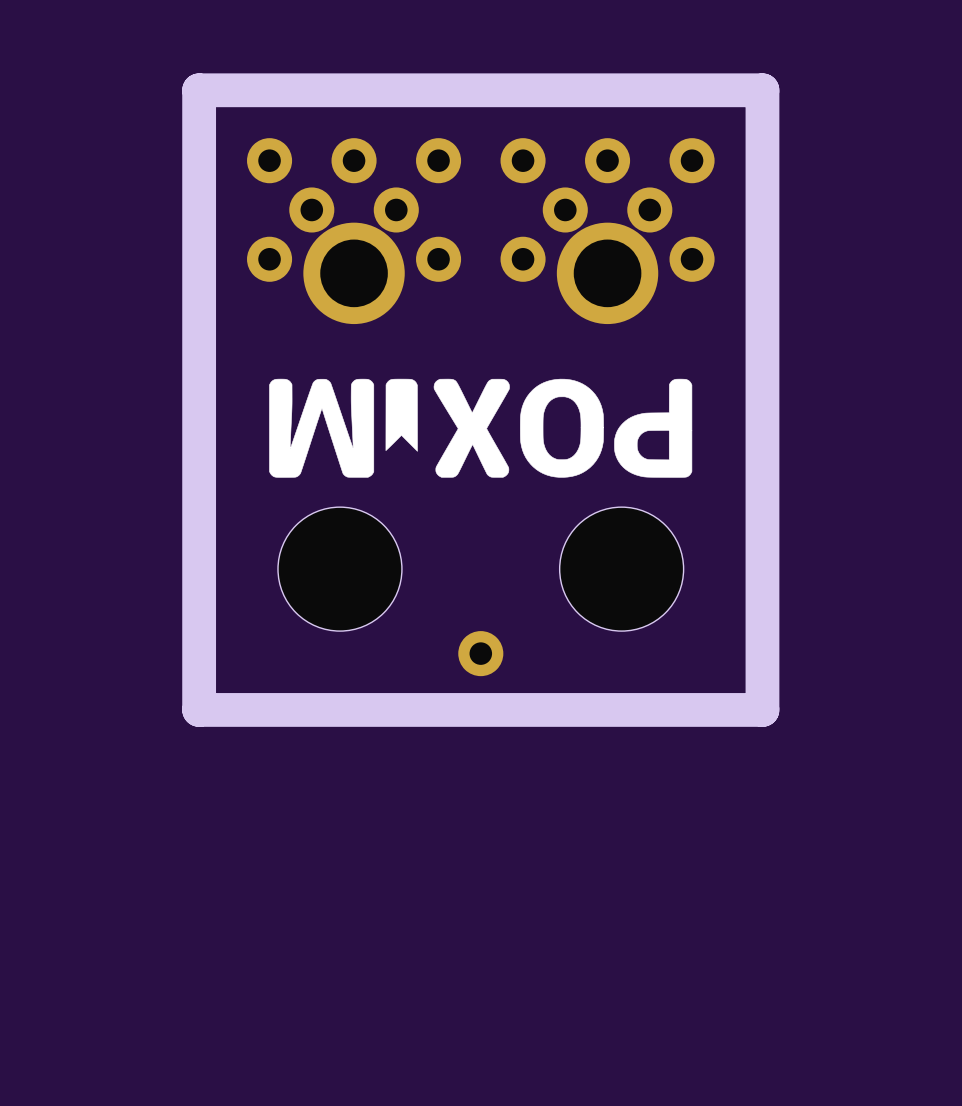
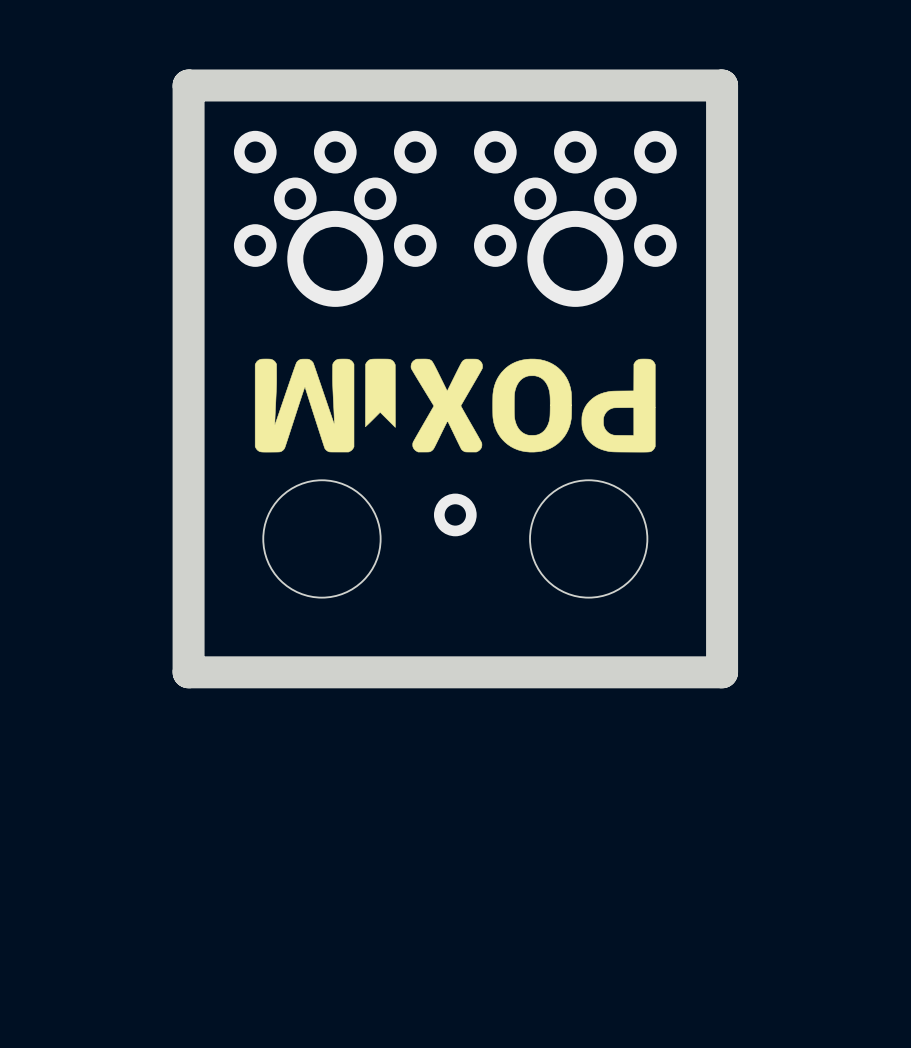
via position: (480, 653) -> (455, 514)

